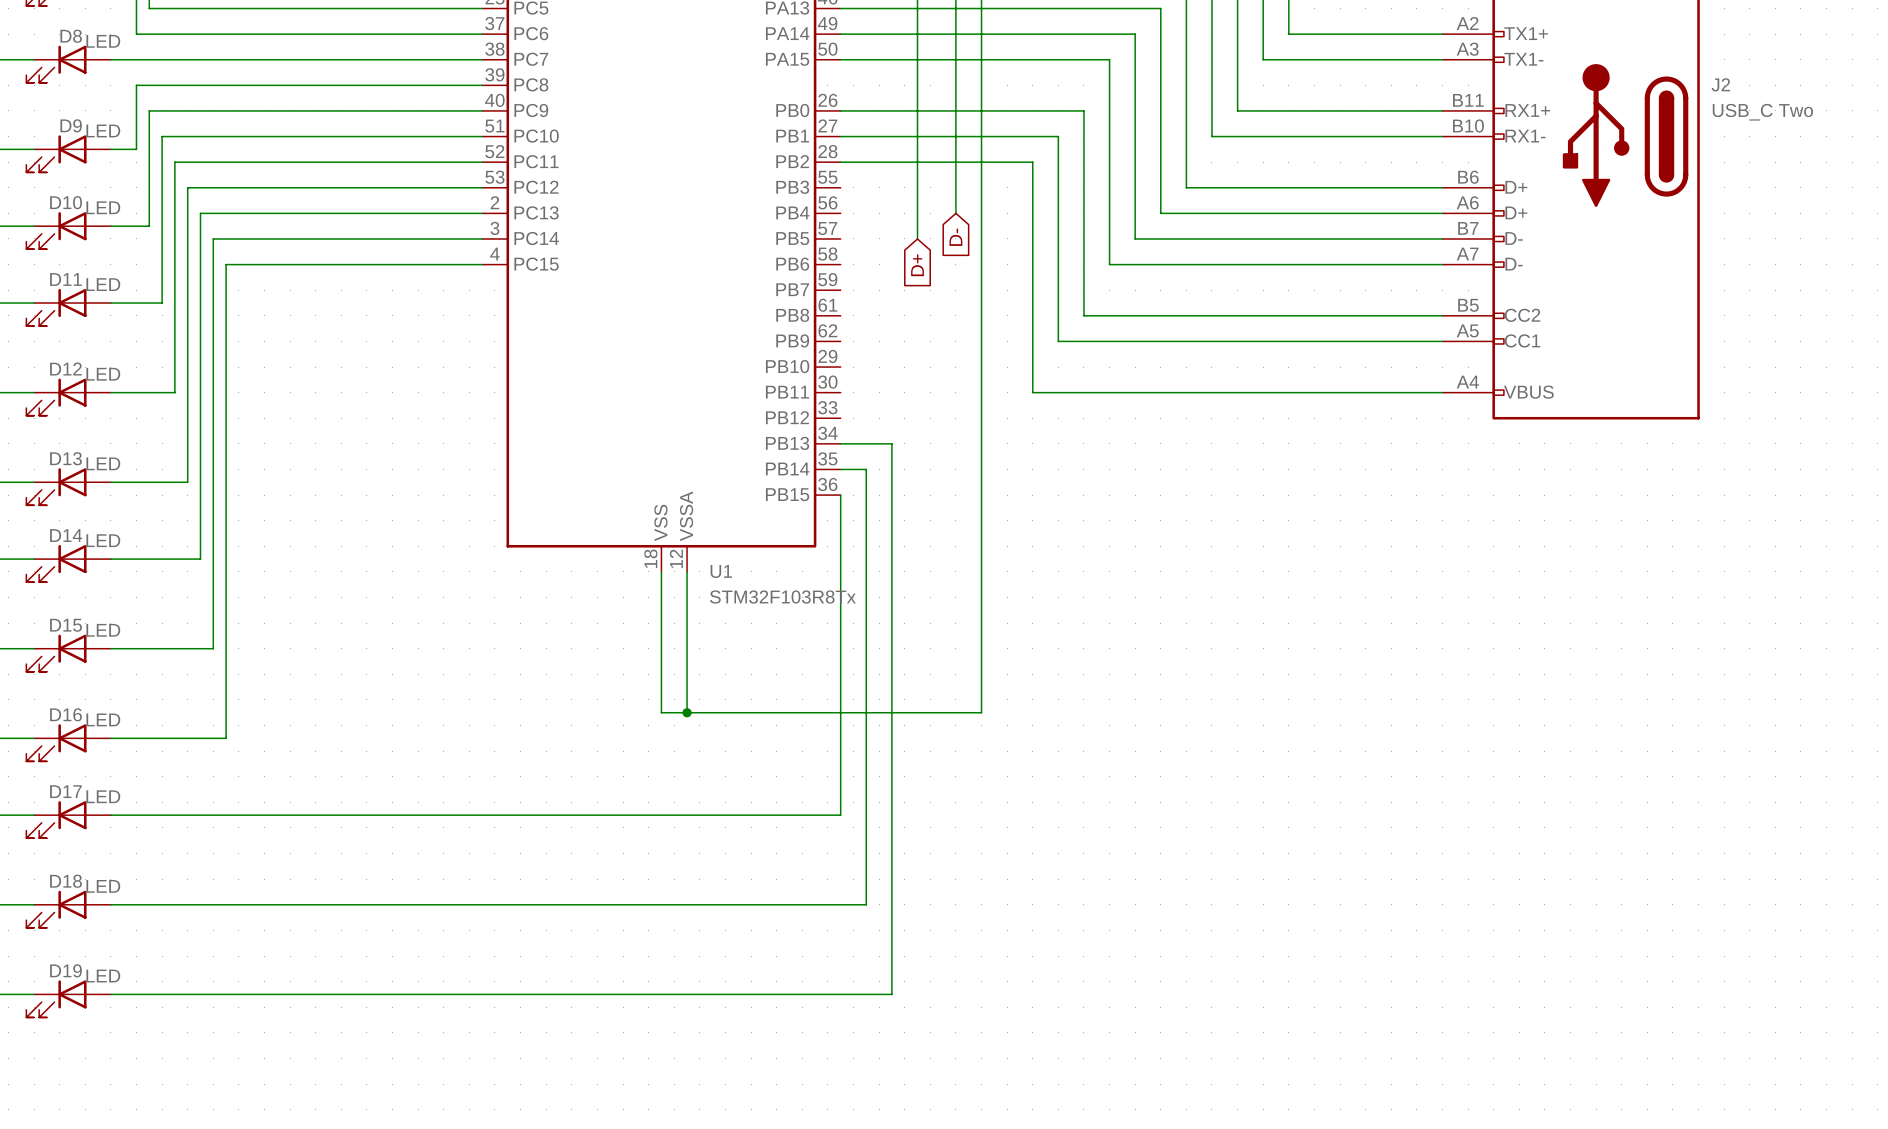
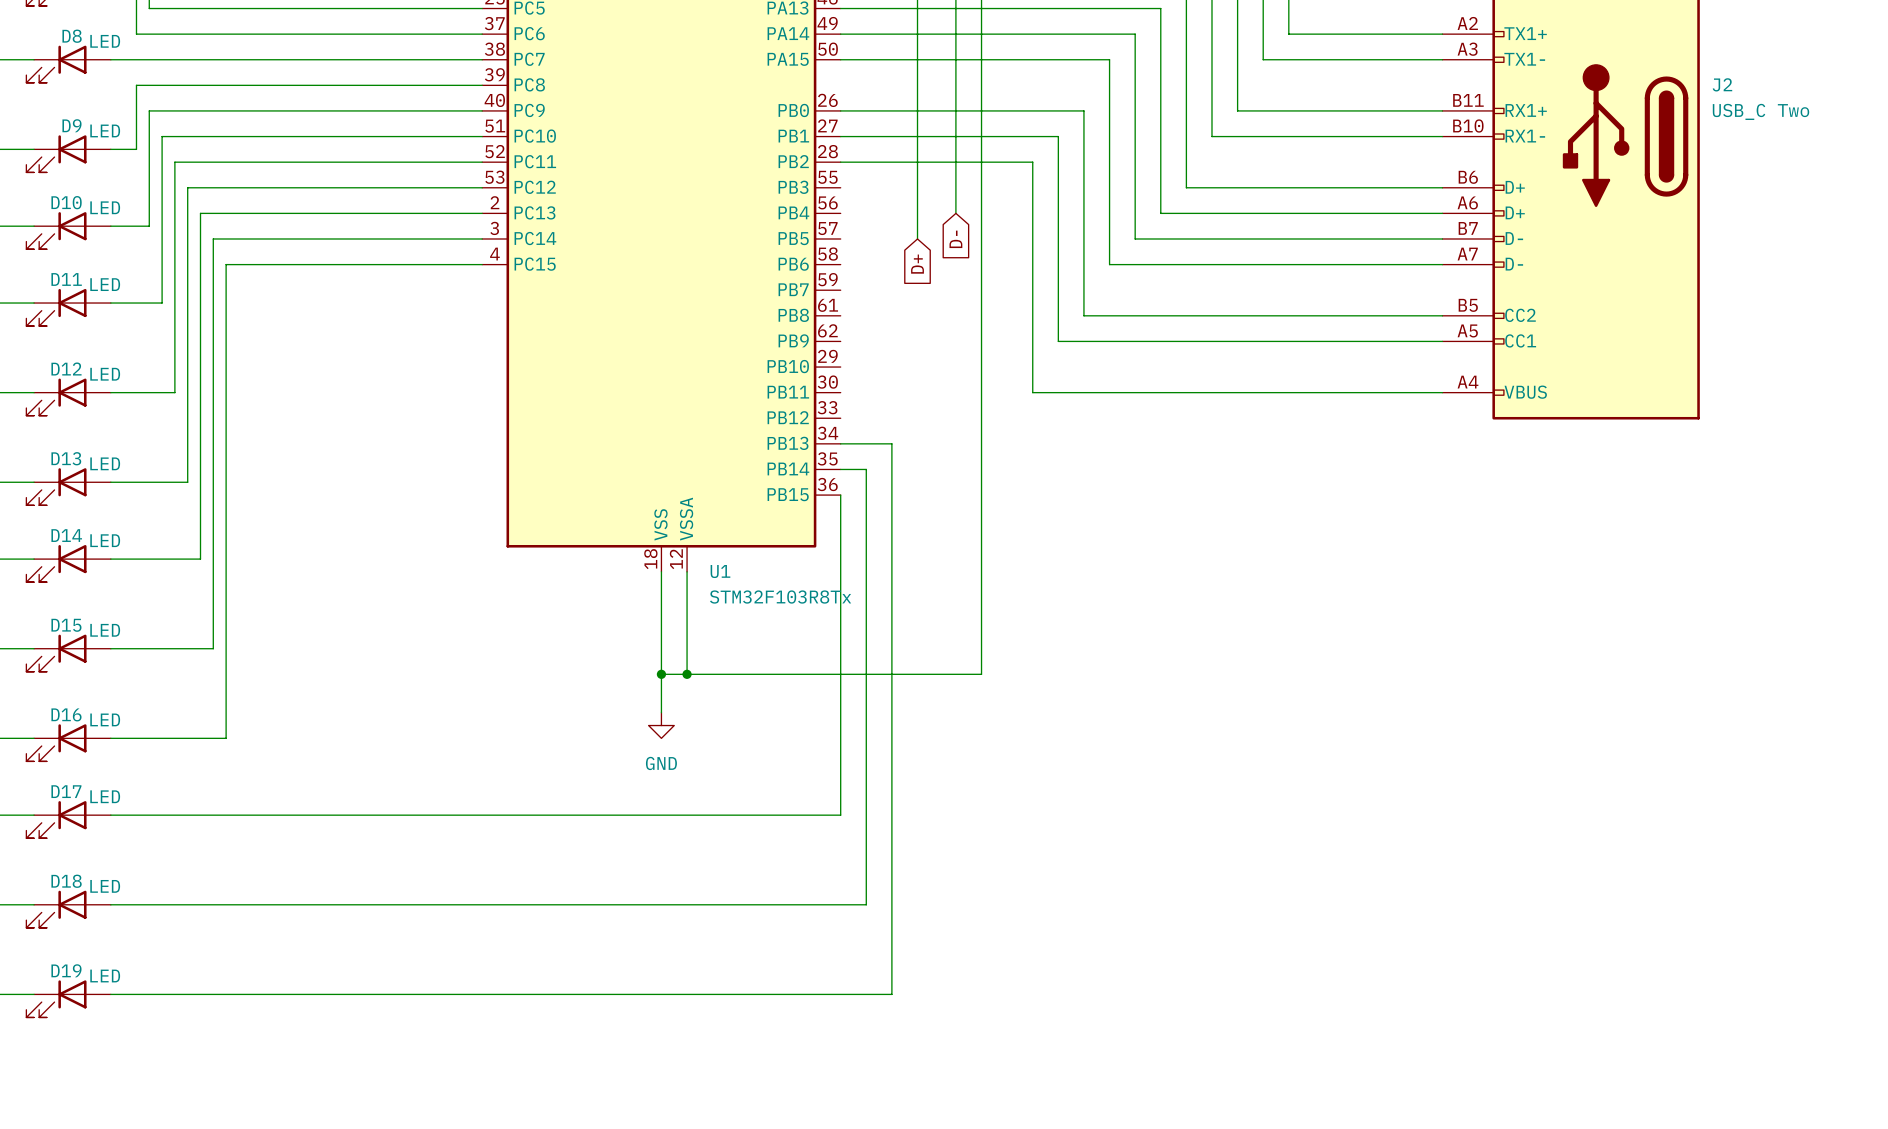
junction: none -> (661, 674)
wire: (687, 674) (687, 712) -> none
junction: none -> (687, 674)
wire: (981, 674) (981, 712) (661, 712) -> (981, 674) (661, 674)
junction: (687, 712) -> none
power symbol: none -> GND (661, 725)

